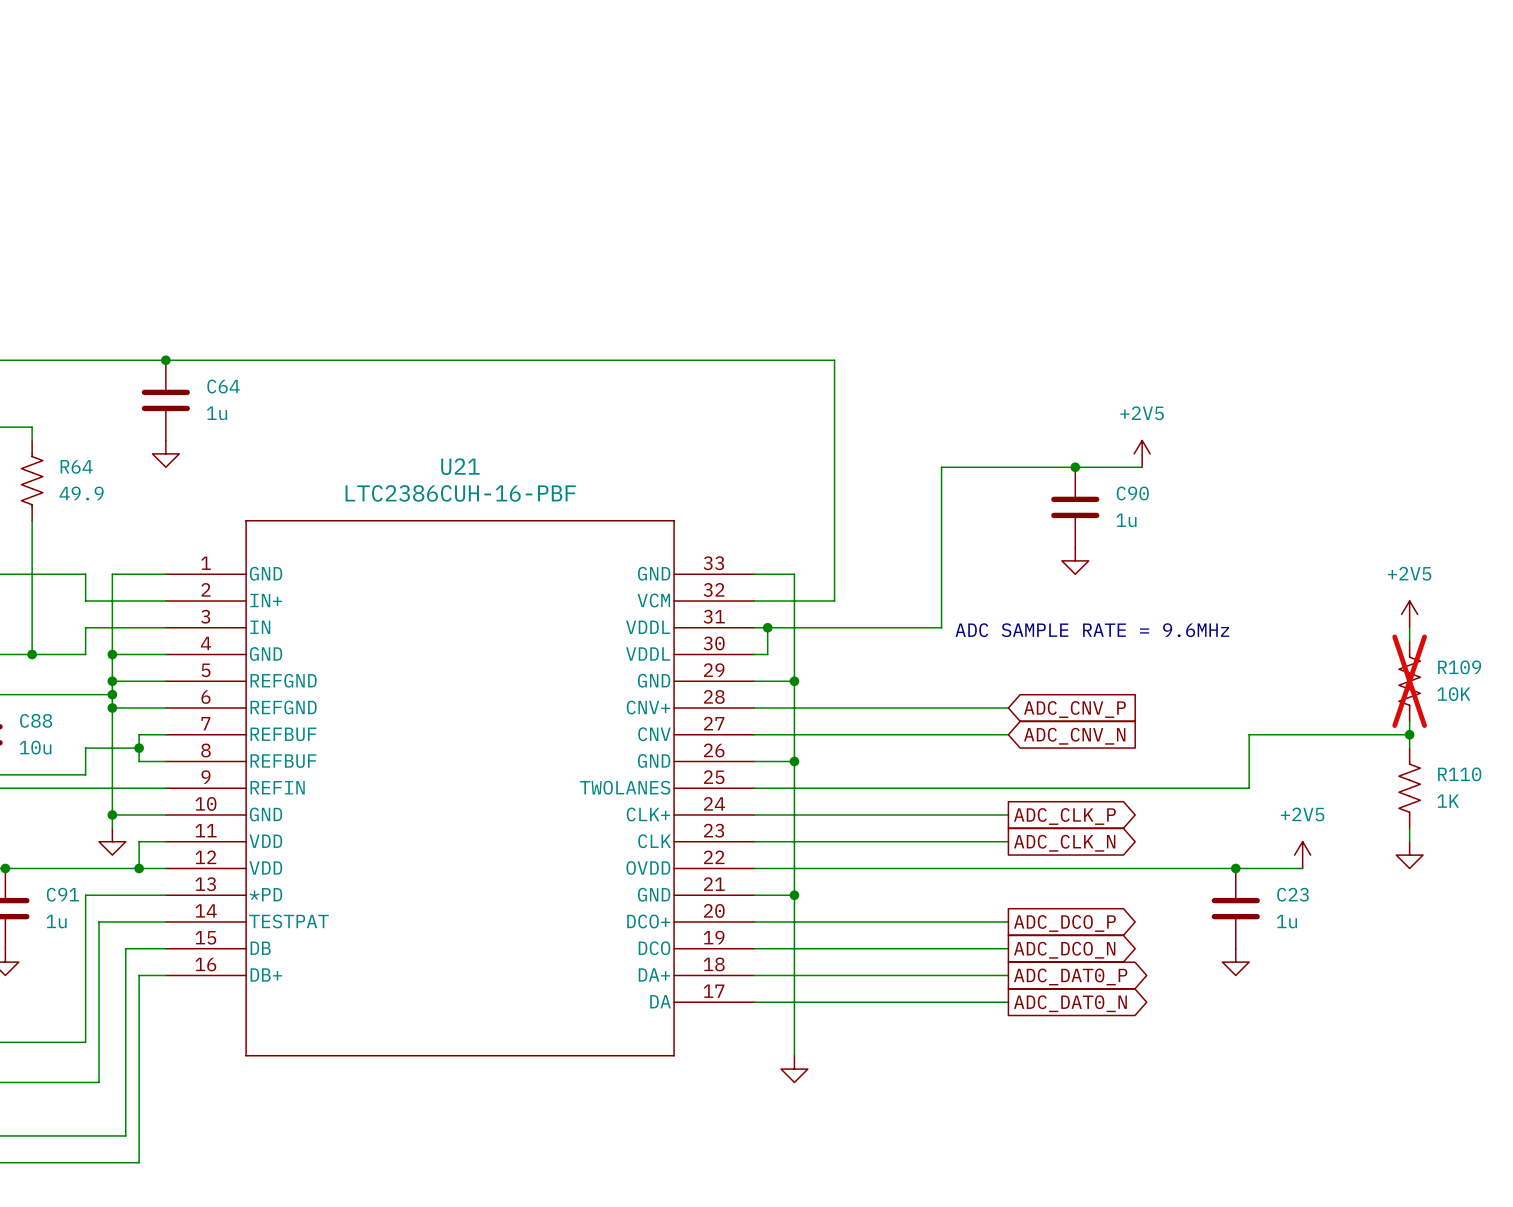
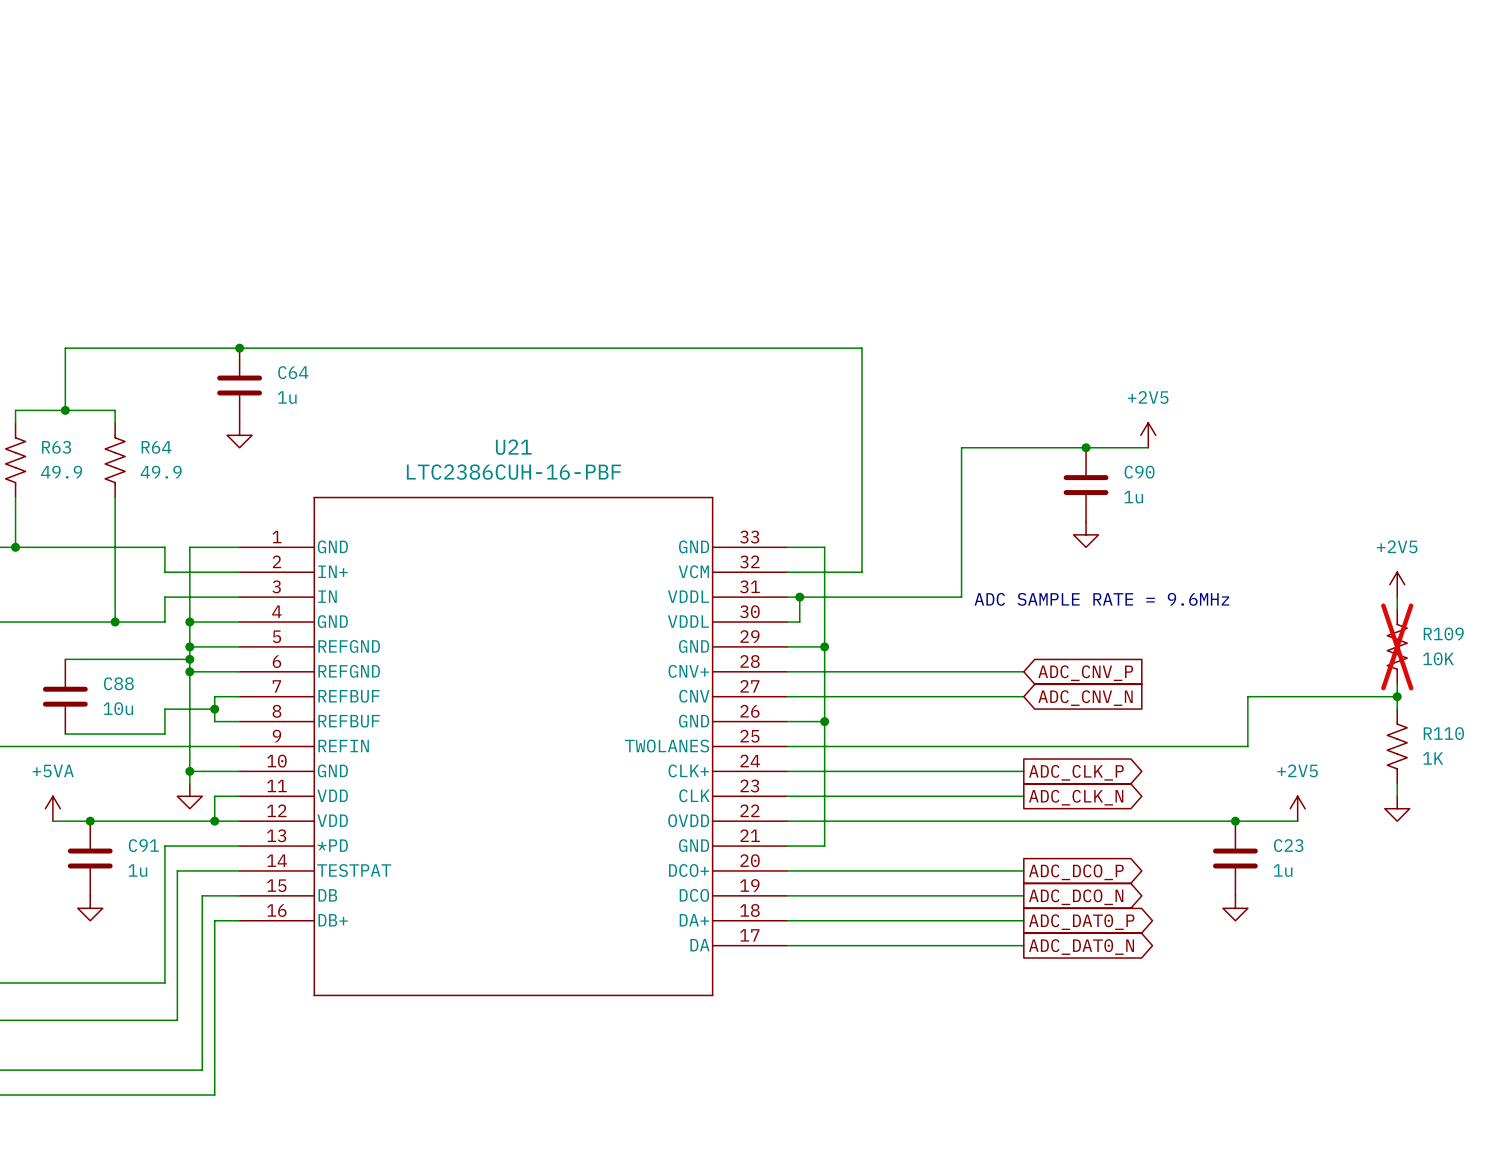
wire: (794, 895) (794, 1055) -> none
junction: (794, 895) -> none
power symbol: (794, 1069) -> none

